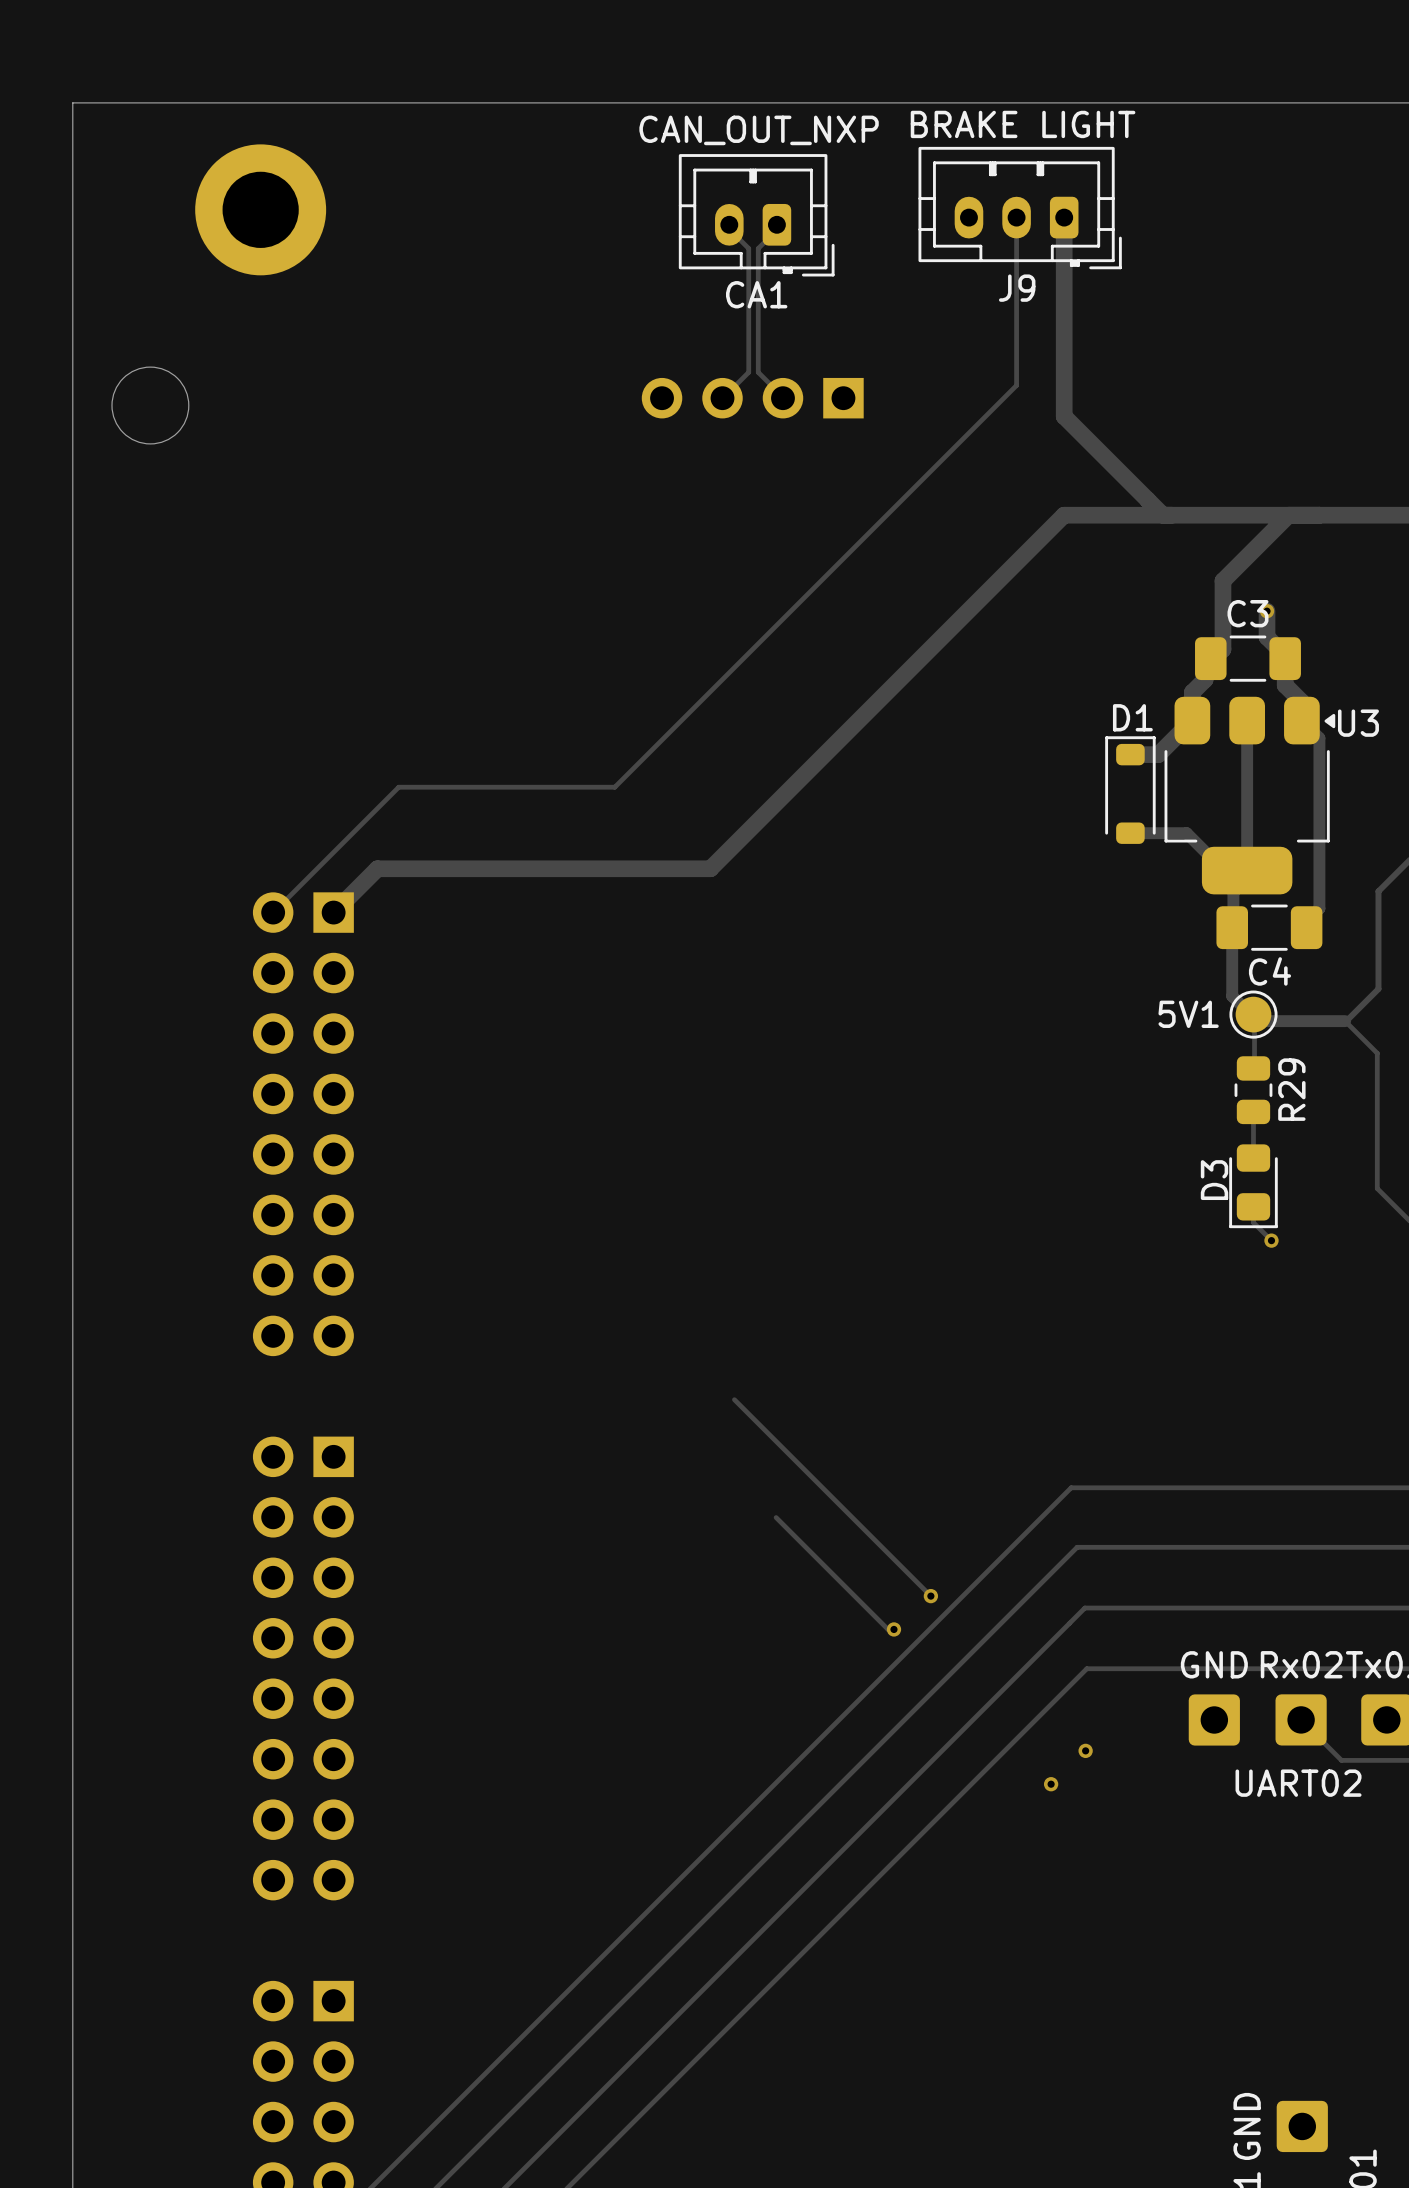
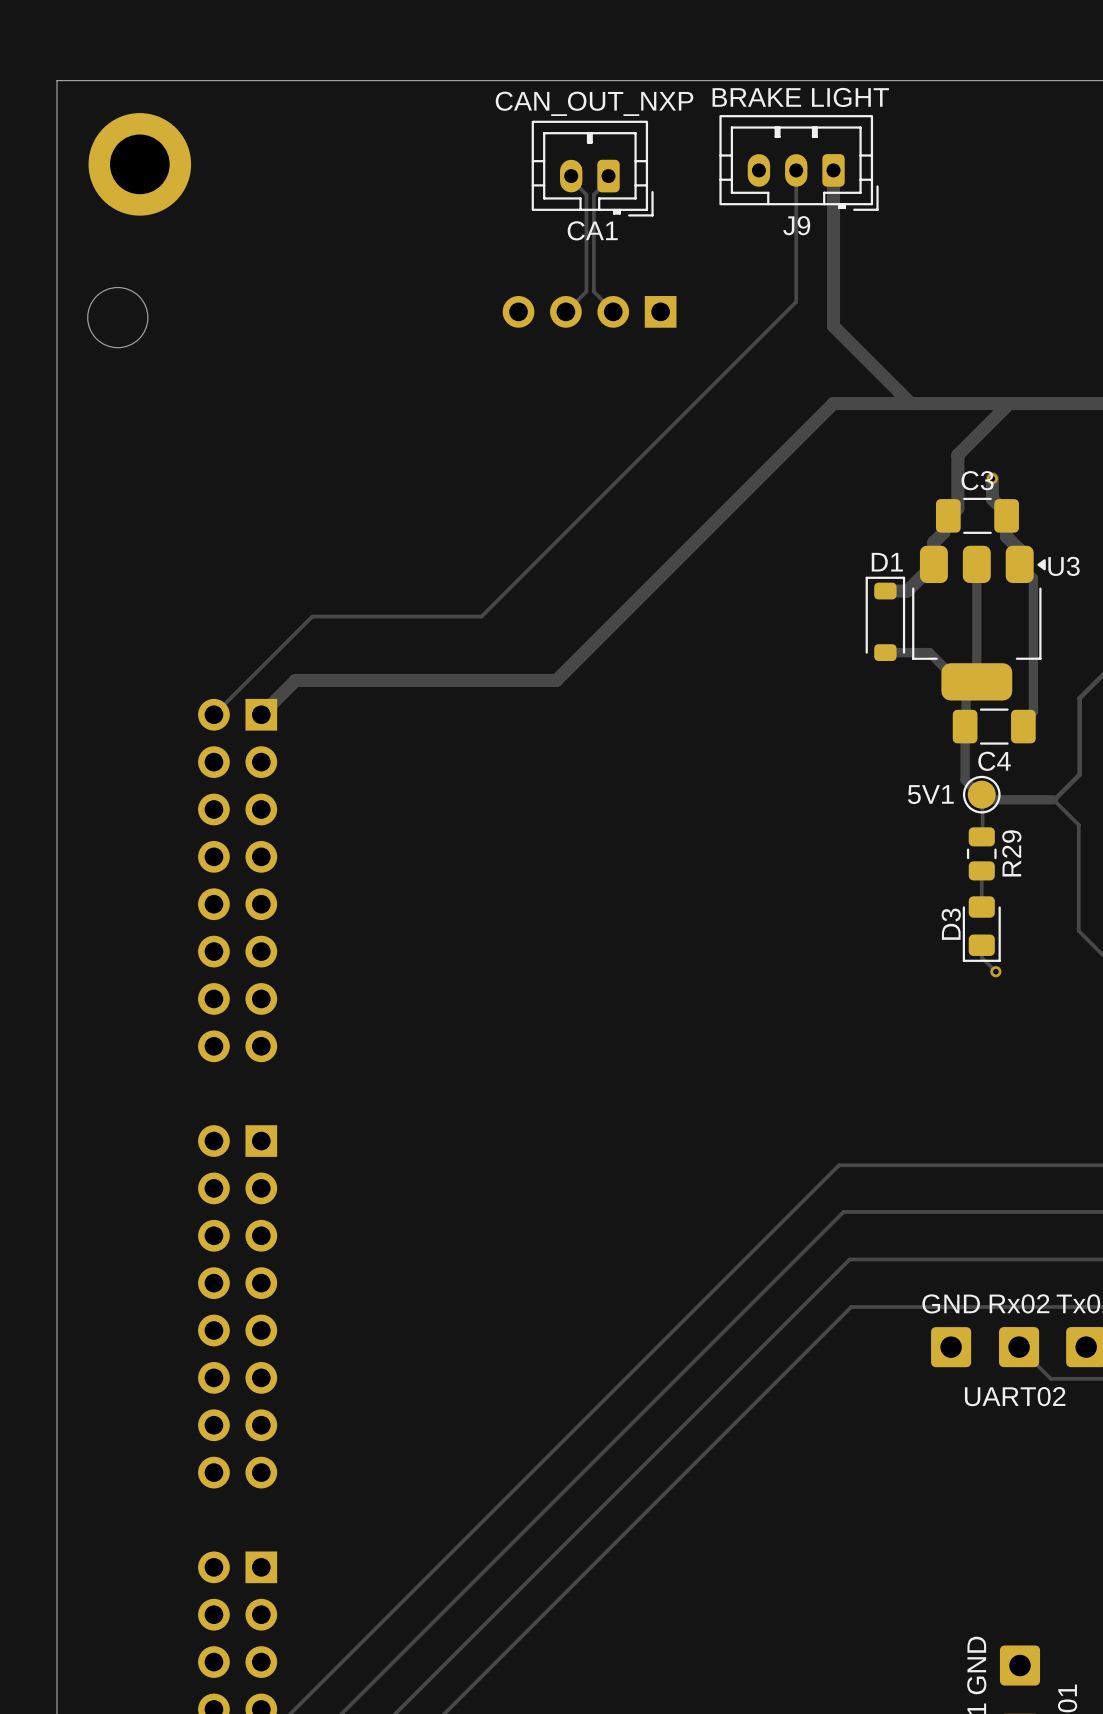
part position: (260, 209) -> (139, 164)
track: (734, 1399) (930, 1596) -> none
track: (776, 1517) (888, 1629) (893, 1629) -> none
via: (930, 1596) -> none
via: (893, 1629) -> none
via: (1085, 1750) -> none
via: (1051, 1784) -> none

